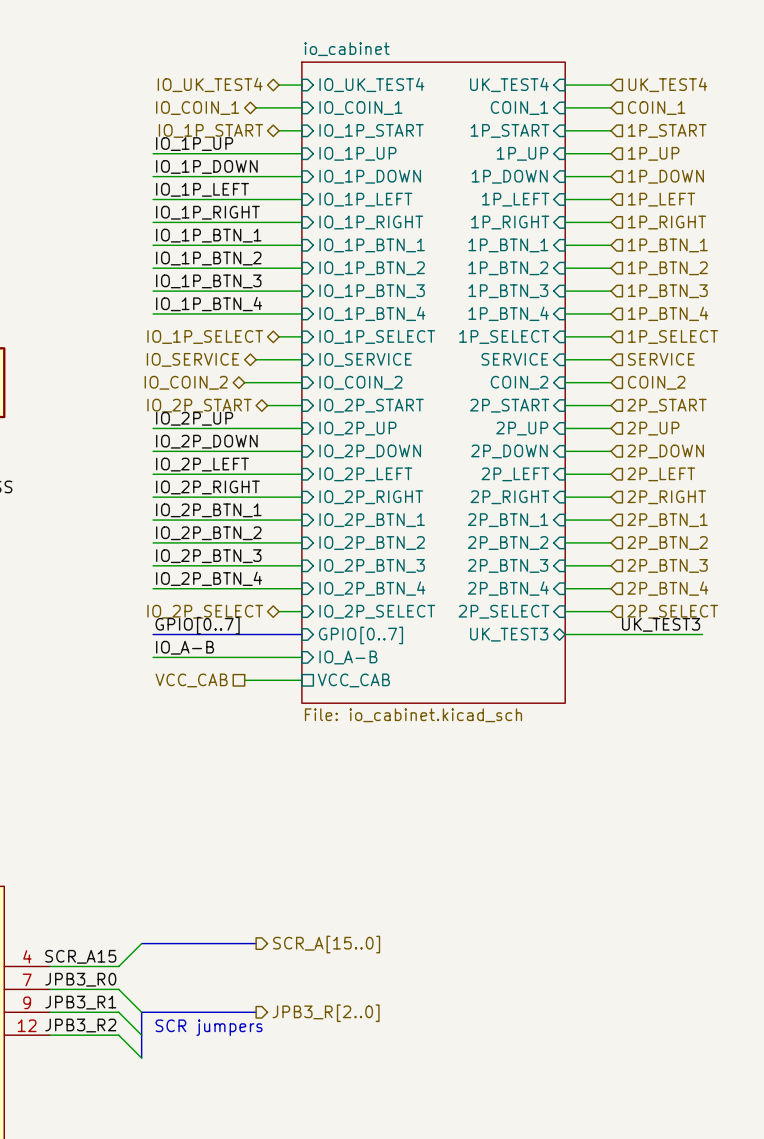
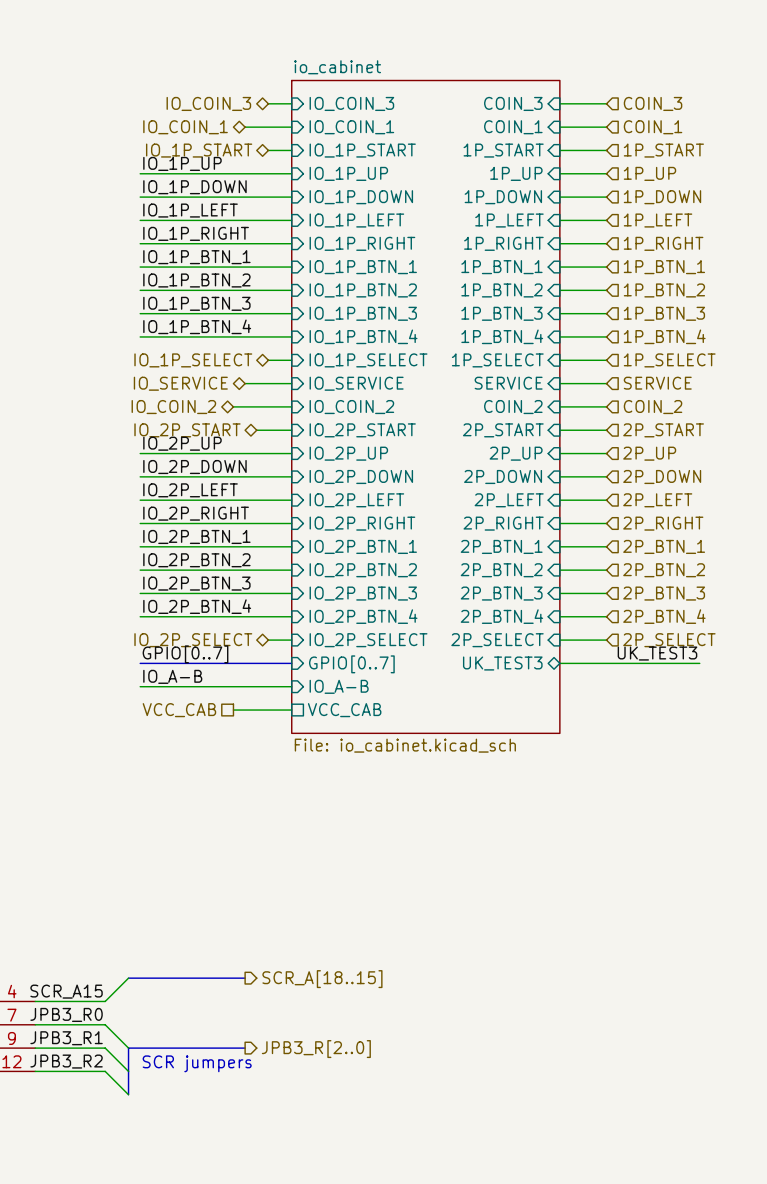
hierarchical label: IO_UK_TEST4 (210, 84) -> IO_COIN_3 (208, 103)
sheet pin: IO_UK_TEST4 (371, 84) -> IO_COIN_3 (351, 103)
sheet pin: UK_TEST4 (509, 84) -> COIN_3 (513, 103)
hierarchical label: UK_TEST4 (667, 84) -> COIN_3 (653, 103)
hierarchical label: SCR_A[15..0] (326, 944) -> SCR_A[18..15] (322, 979)

